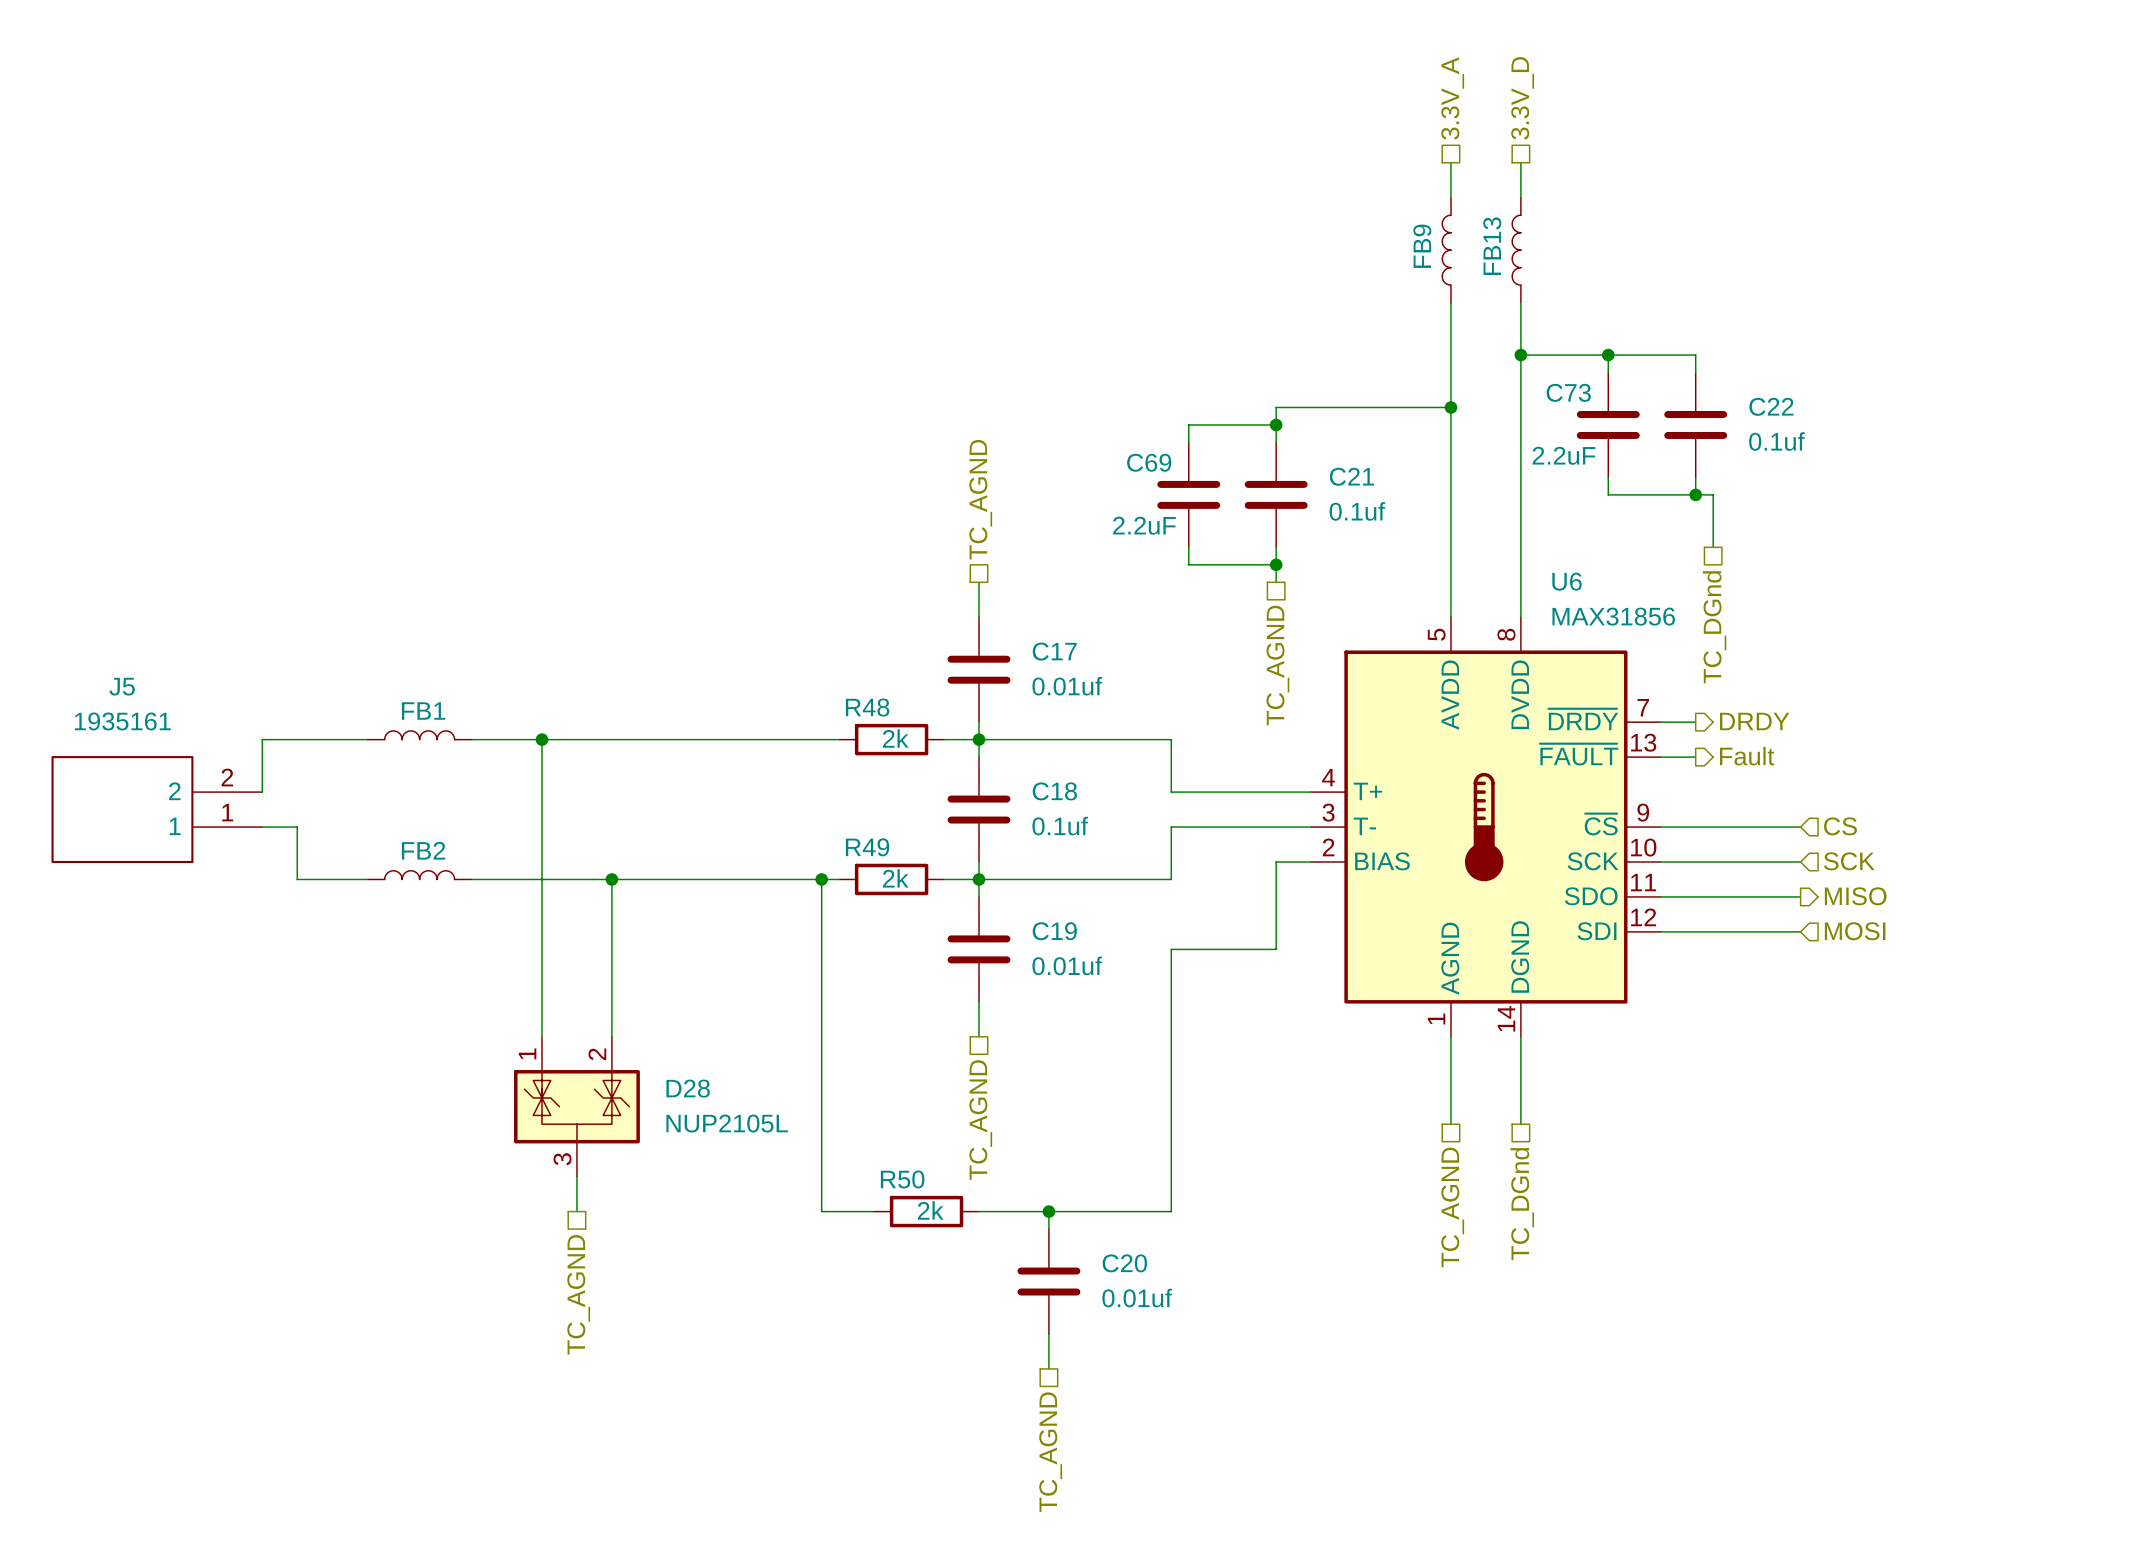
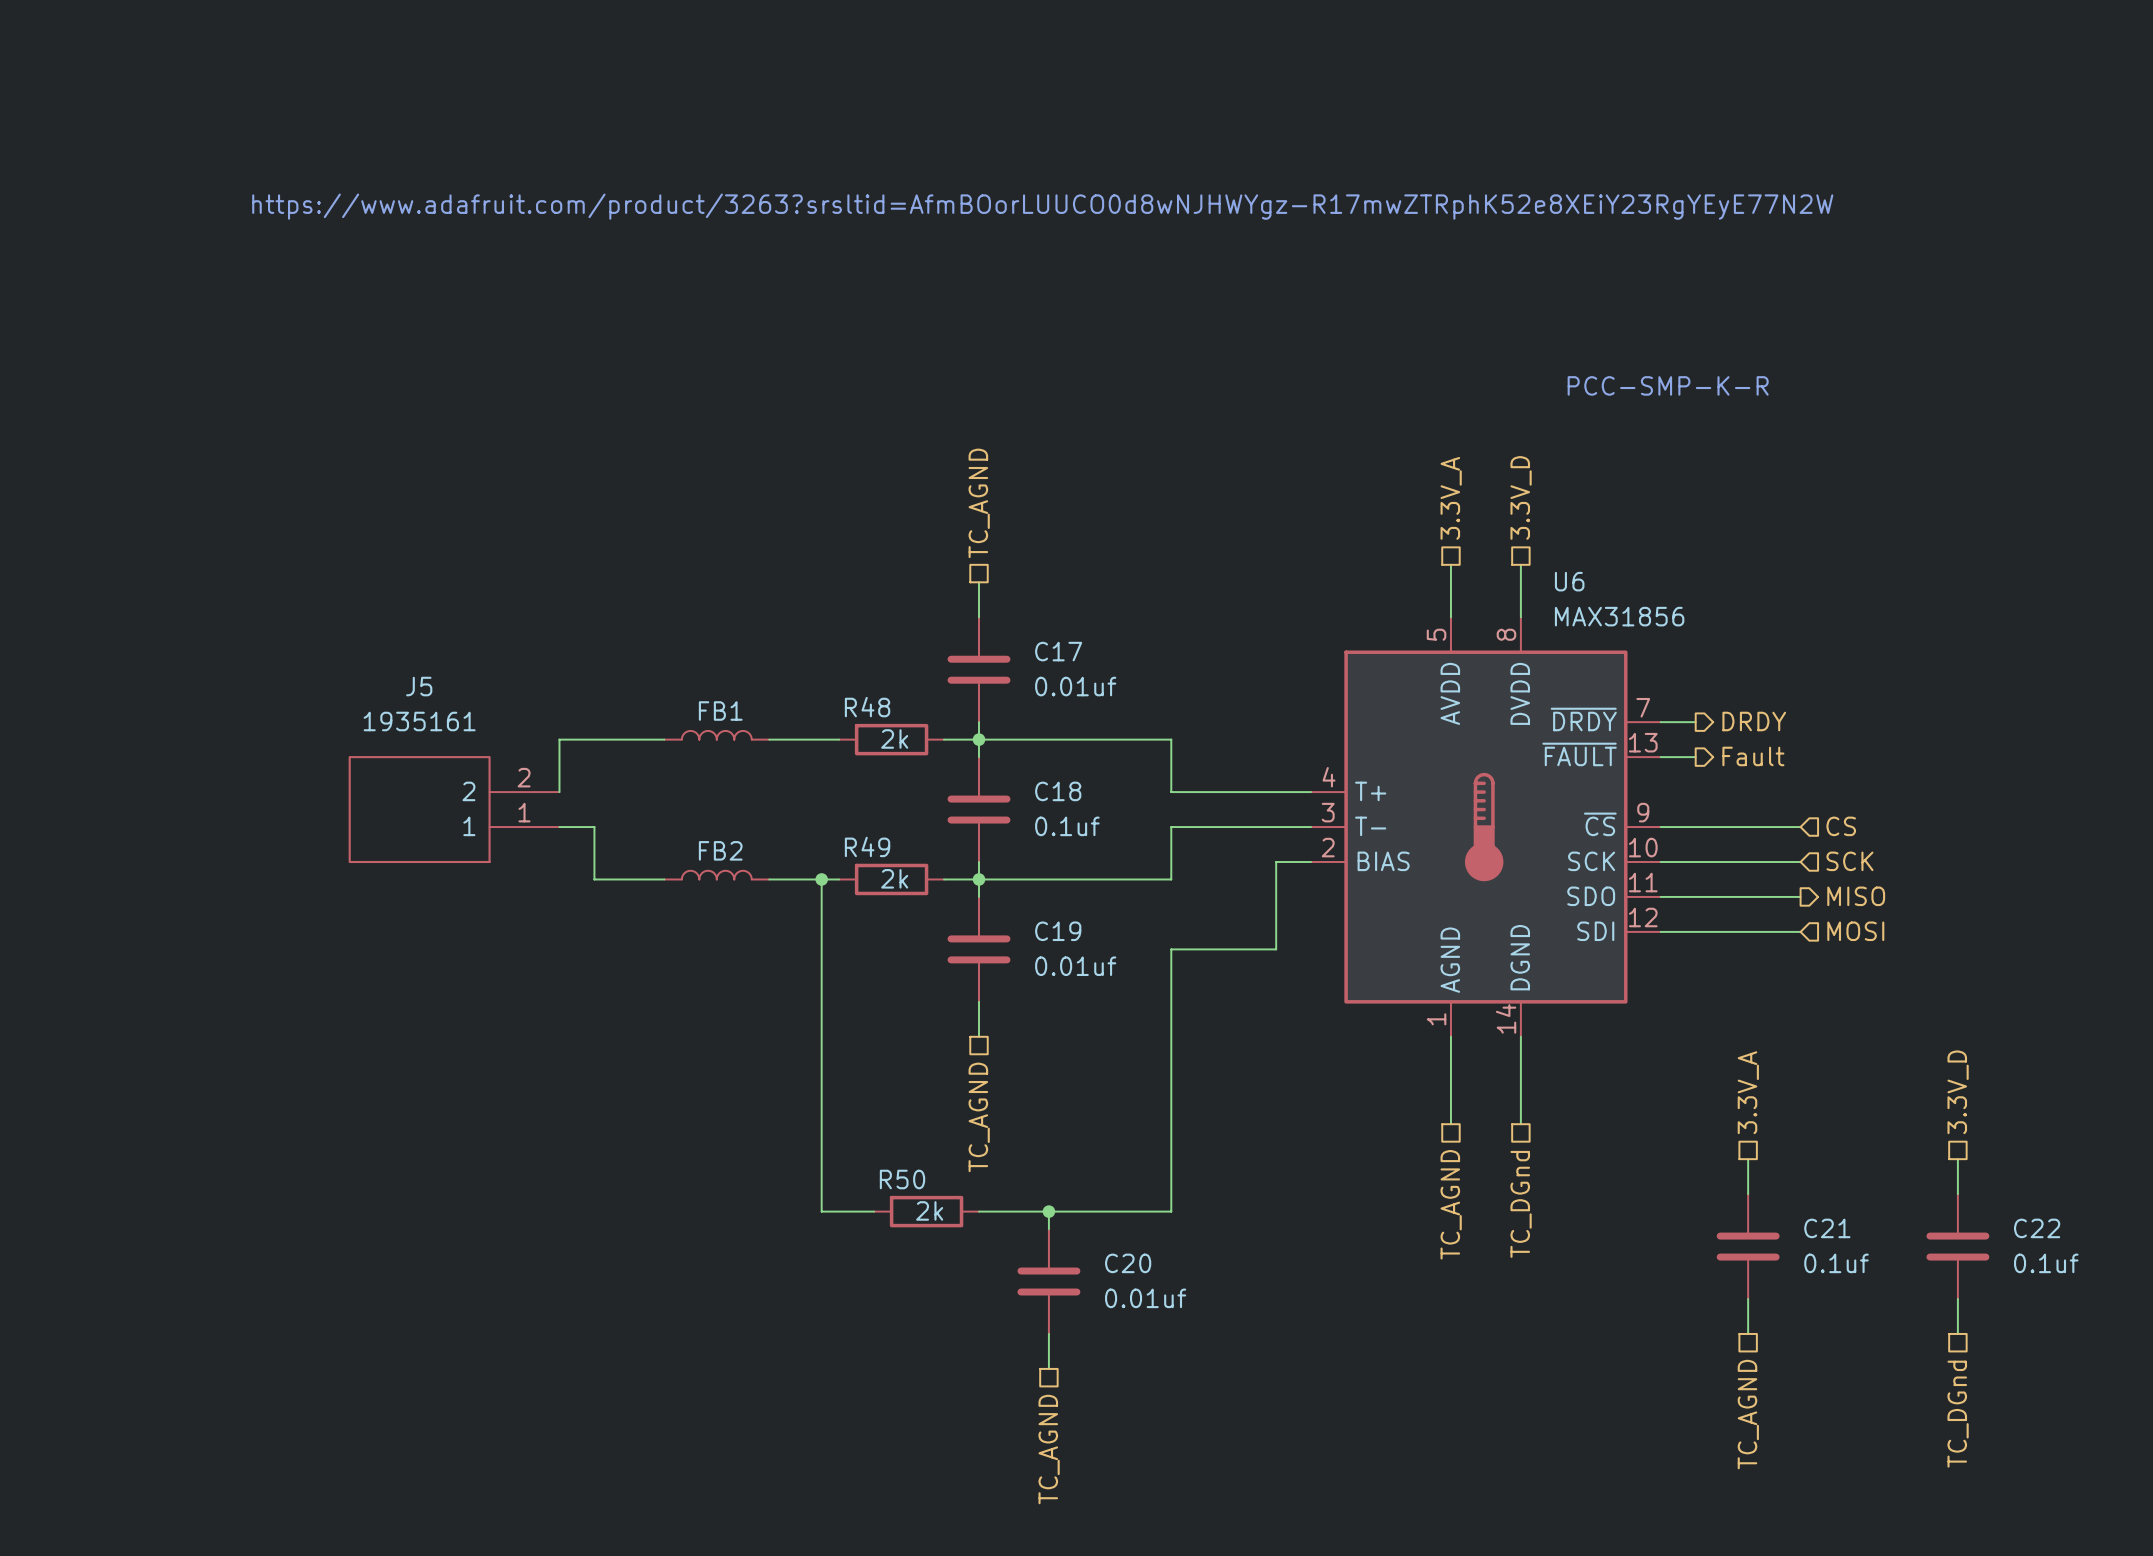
hierarchical label: 3.3V_A (1452, 98) -> none
hierarchical label: 3.3V_D (1522, 98) -> none
wire: (1450, 162) (1450, 197) -> none
wire: (1520, 162) (1520, 197) -> none
text: none -> https://www.adafruit.com/product/3263?srsltid=AfmBOorLUUCO0d8wNJHWYgz-R17mwZTRphK52e8XEiY23RgYEyE77N2W (1042, 206)
FB9: (1446, 250) -> none
FB13: (1516, 250) -> none
wire: (1450, 302) (1450, 564) -> none
wire: (1520, 302) (1520, 564) -> none
wire: (1520, 355) (1695, 355) (1695, 372) -> none
junction: (1520, 355) -> none
wire: (1608, 355) (1608, 372) -> none
junction: (1608, 355) -> none
text: none -> PCC-SMP-K-R (1668, 385)
wire: (1450, 407) (1276, 407) (1276, 442) -> none
junction: (1450, 407) -> none
wire: (1276, 424) (1188, 424) (1188, 442) -> none
junction: (1276, 424) -> none
C73: 2.2uF (1608, 424) -> none
C22 position: (1695, 424) -> (1957, 1246)
wire: (1608, 477) (1608, 494) (1713, 494) (1713, 547) -> none
wire: (1695, 477) (1695, 494) -> none
C69: 2.2uF (1188, 494) -> none
C21 position: (1276, 494) -> (1748, 1246)
junction: (1695, 494) -> none
hierarchical label: none -> 3.3V_A (1451, 498)
hierarchical label: none -> 3.3V_D (1521, 497)
wire: (1188, 547) (1188, 564) (1276, 564) -> none
wire: (1276, 547) (1276, 582) -> none
junction: (1276, 564) -> none
hierarchical label: TC_DGnd (1714, 627) -> none
hierarchical label: TC_AGND (1277, 665) -> none
FB1 position: (419, 735) -> (716, 735)
wire: (367, 739) (262, 739) (262, 792) -> none
wire: (472, 739) (559, 739) -> (559, 792) (559, 739)
wire: (541, 739) (541, 1036) -> none
junction: (541, 739) -> none
wire: (664, 739) (769, 739) -> none
J5 position: (156, 809) -> (454, 809)
wire: (262, 827) (297, 827) (297, 879) (367, 879) -> none
FB2 position: (419, 875) -> (716, 875)
wire: (472, 879) (594, 879) -> (559, 827) (594, 827) (594, 879)
wire: (611, 879) (611, 1036) -> none
junction: (611, 879) -> none
wire: (664, 879) (769, 879) -> none
hierarchical label: none -> 3.3V_A (1748, 1092)
hierarchical label: none -> 3.3V_D (1958, 1092)
D28: NUP2105L (576, 1106) -> none
wire: none -> (1748, 1159) (1748, 1194)
wire: none -> (1957, 1159) (1957, 1194)
wire: (576, 1176) (576, 1211) -> none
hierarchical label: TC_AGND (578, 1294) -> none
wire: none -> (1748, 1299) (1748, 1333)
wire: none -> (1957, 1299) (1957, 1333)
hierarchical label: none -> TC_DGnd (1958, 1414)
hierarchical label: none -> TC_AGND (1748, 1414)

